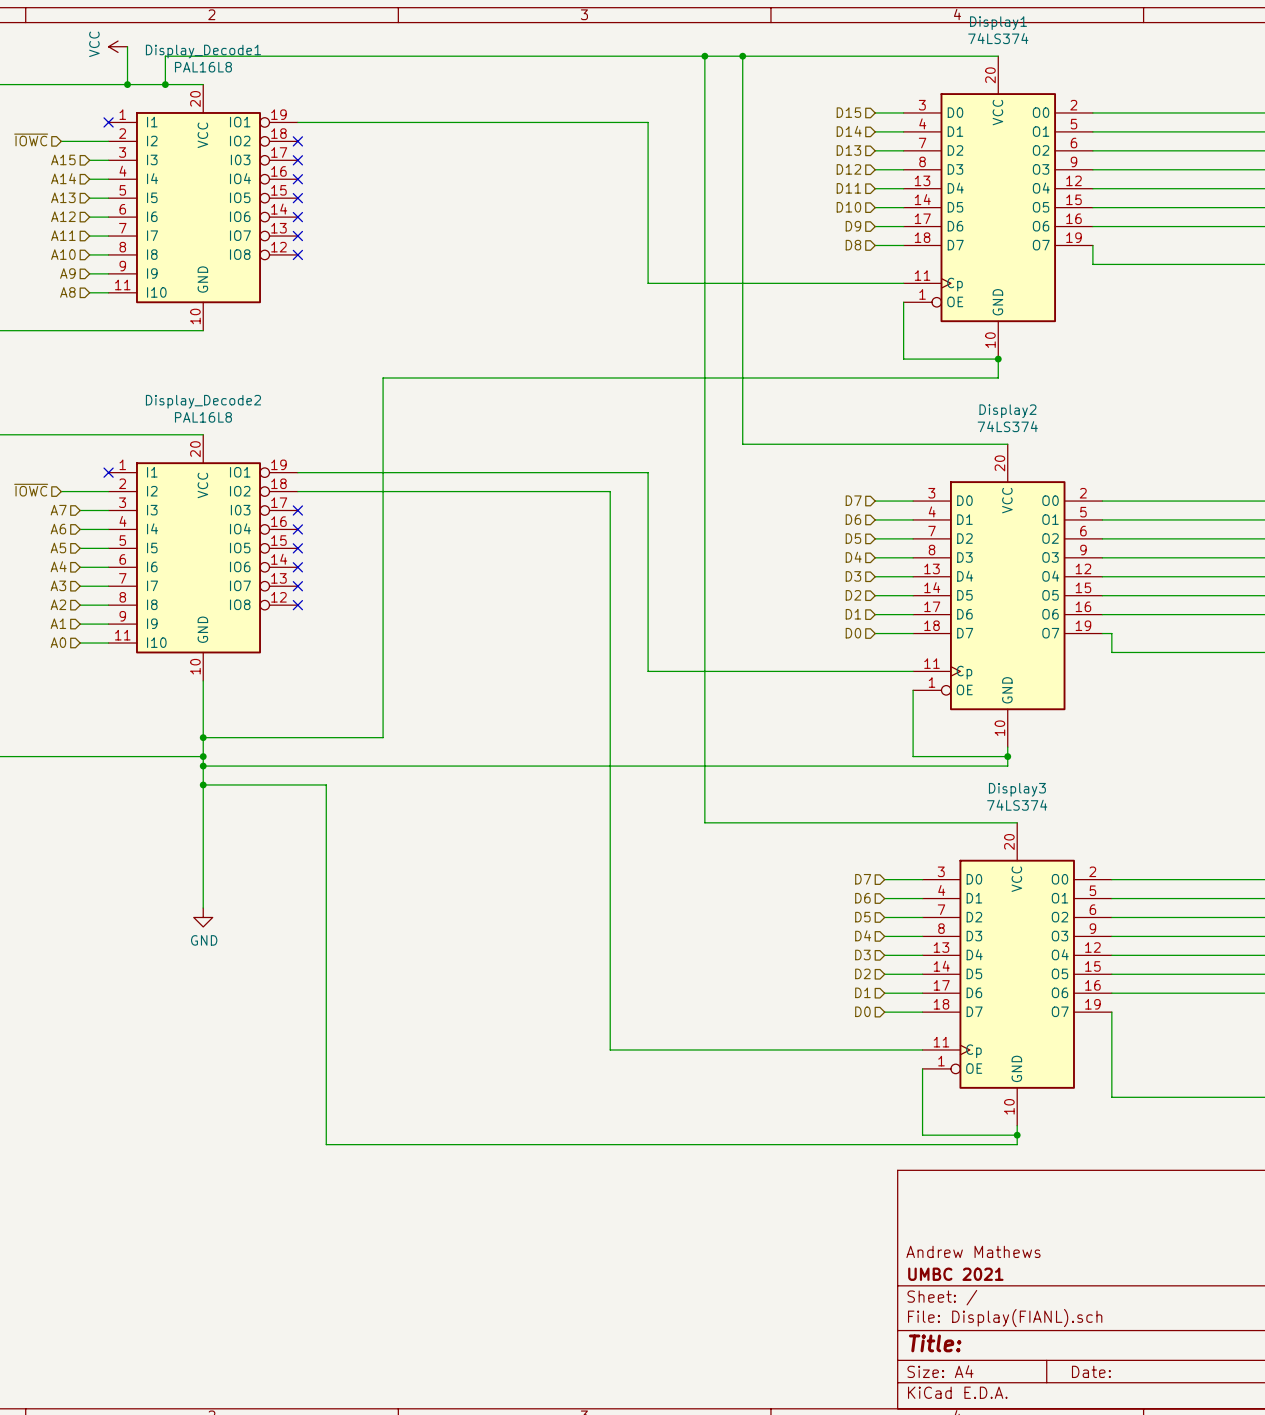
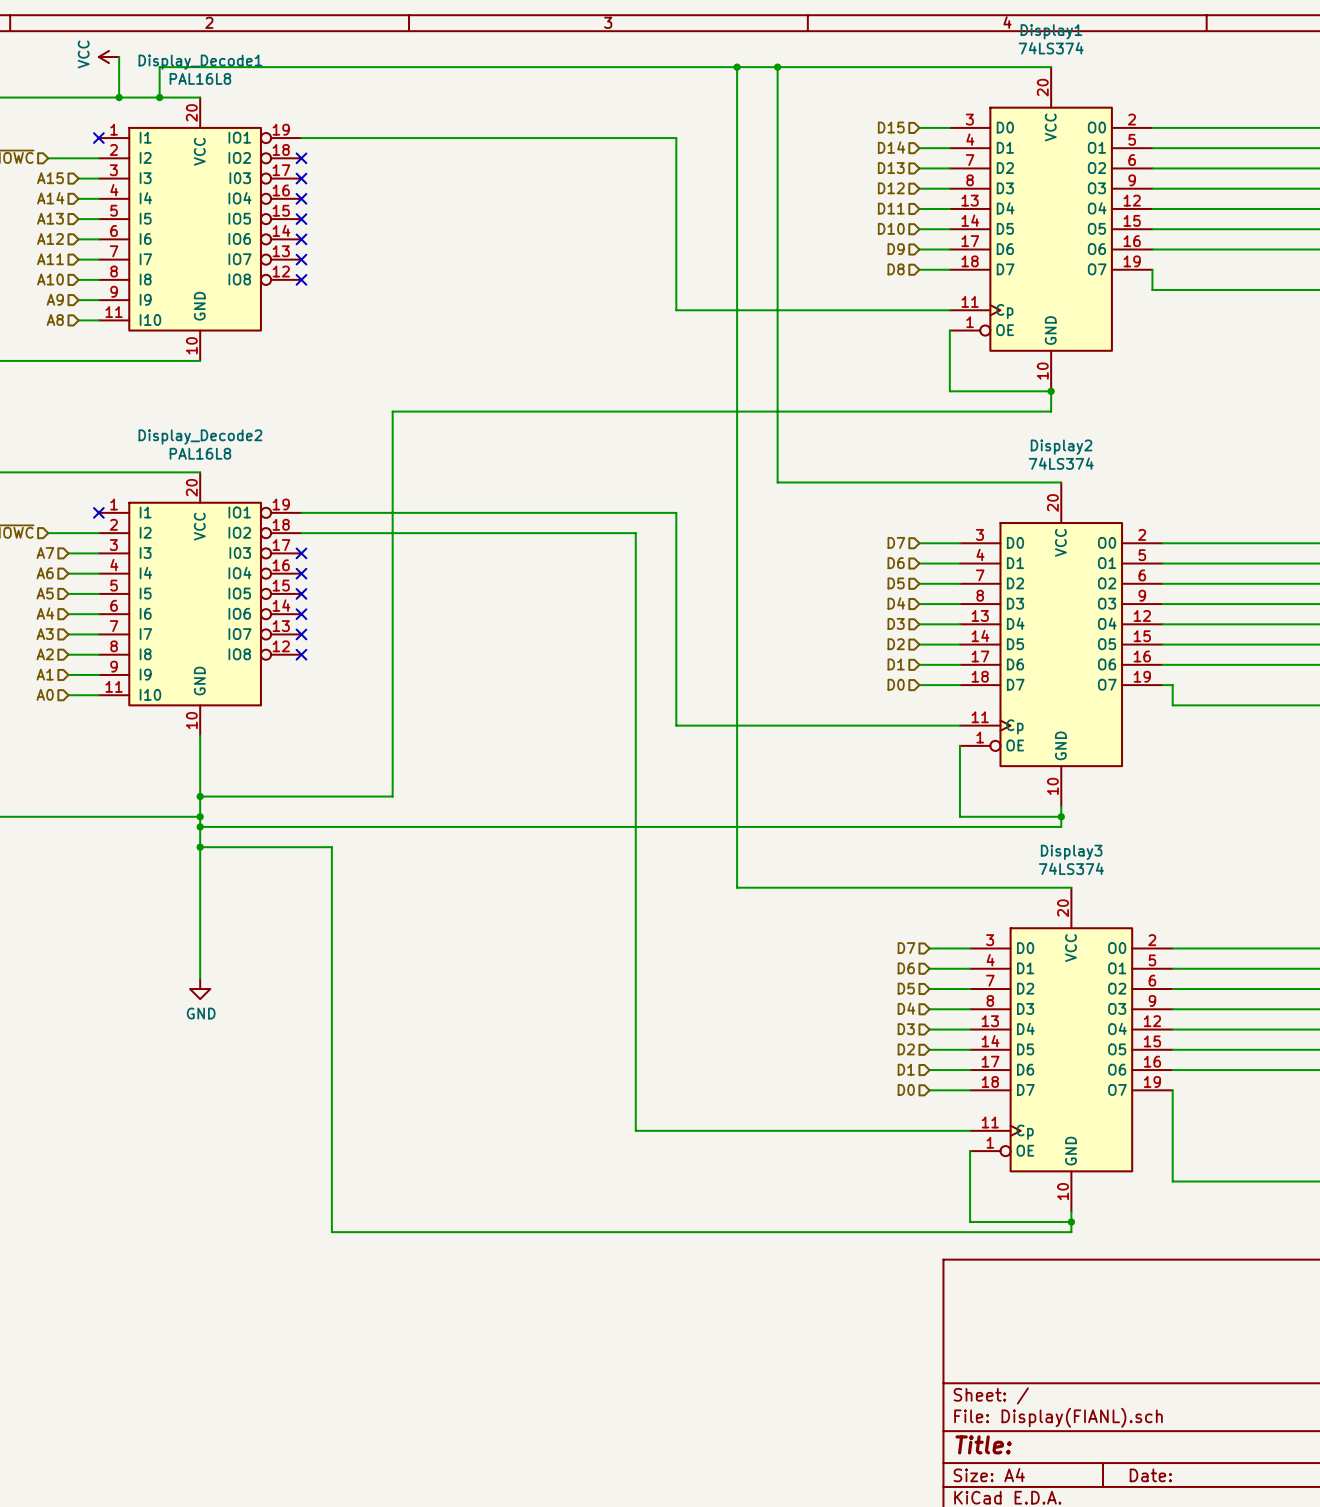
title block: Andrew Mathews (973, 1251) -> none
title block: UMBC 2021 (955, 1274) -> none

